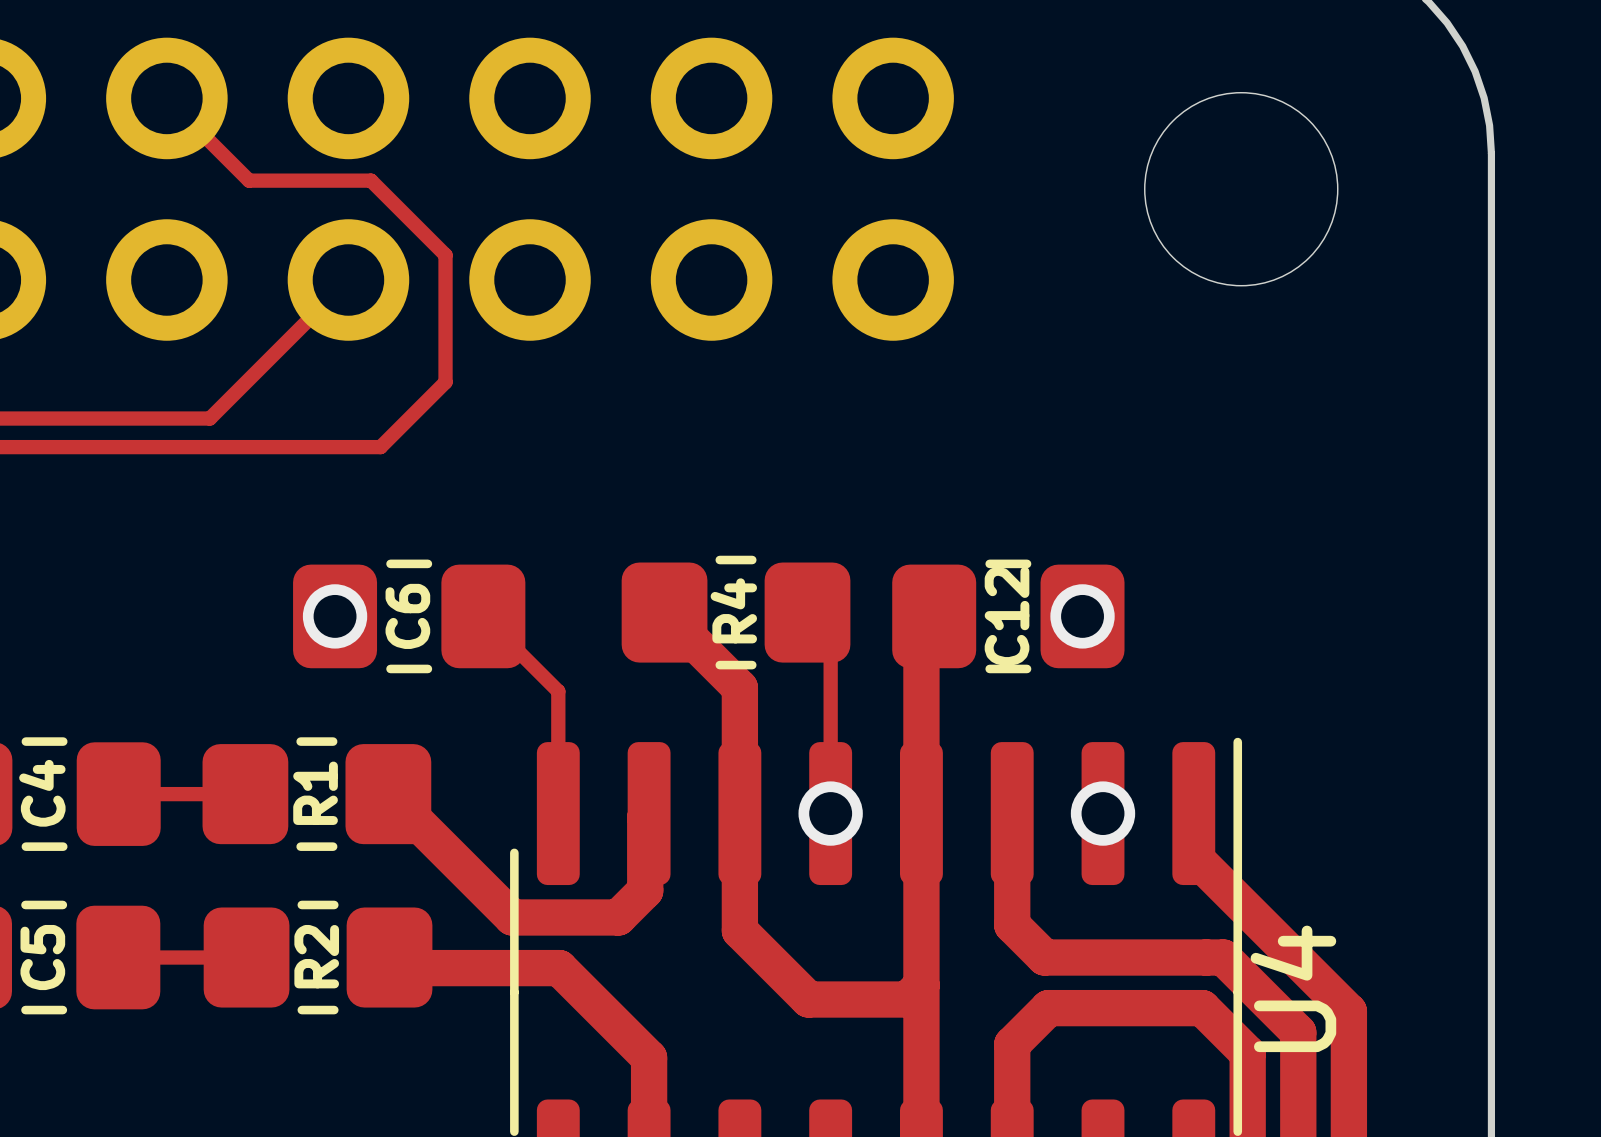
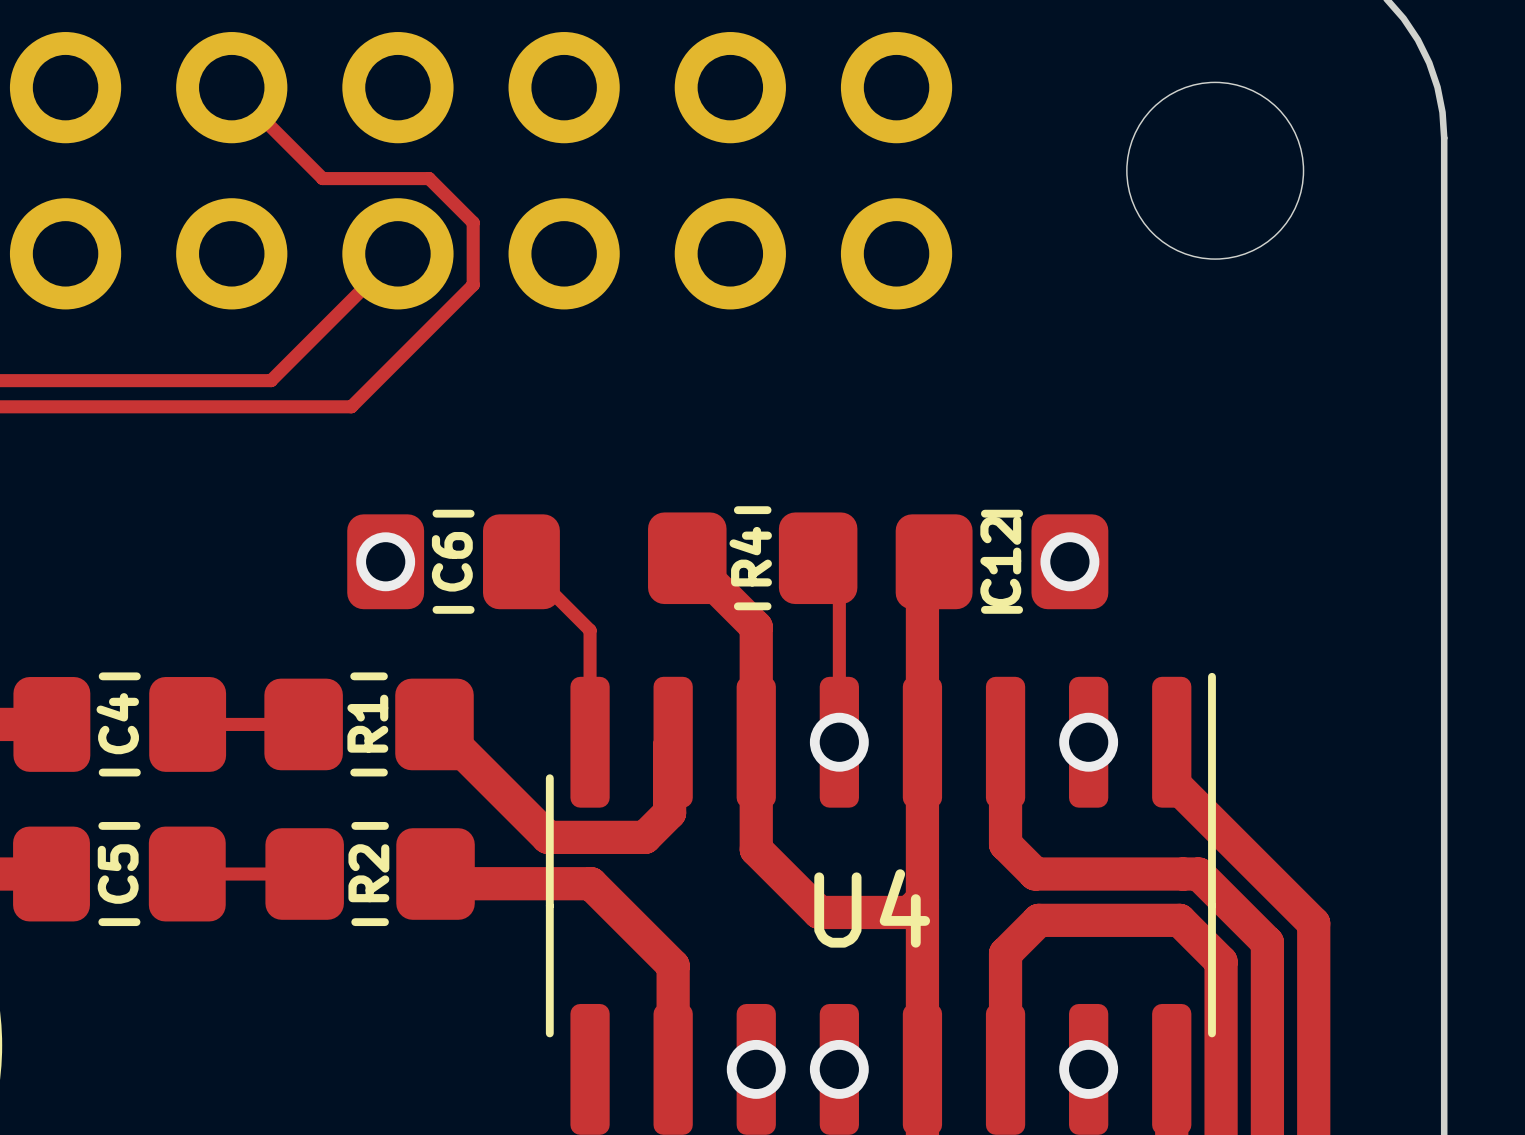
track: (249, 180) (371, 180) (445, 255) (445, 382) (380, 447) (297, 447) -> (306, 162) (322, 178) (429, 178) (473, 222) (473, 285) (351, 406)
U4 name rotation: 0° (1293, 988) -> 90° clockwise (872, 908)
U4 name position: U4 (1293, 988) -> U4 (872, 908)

